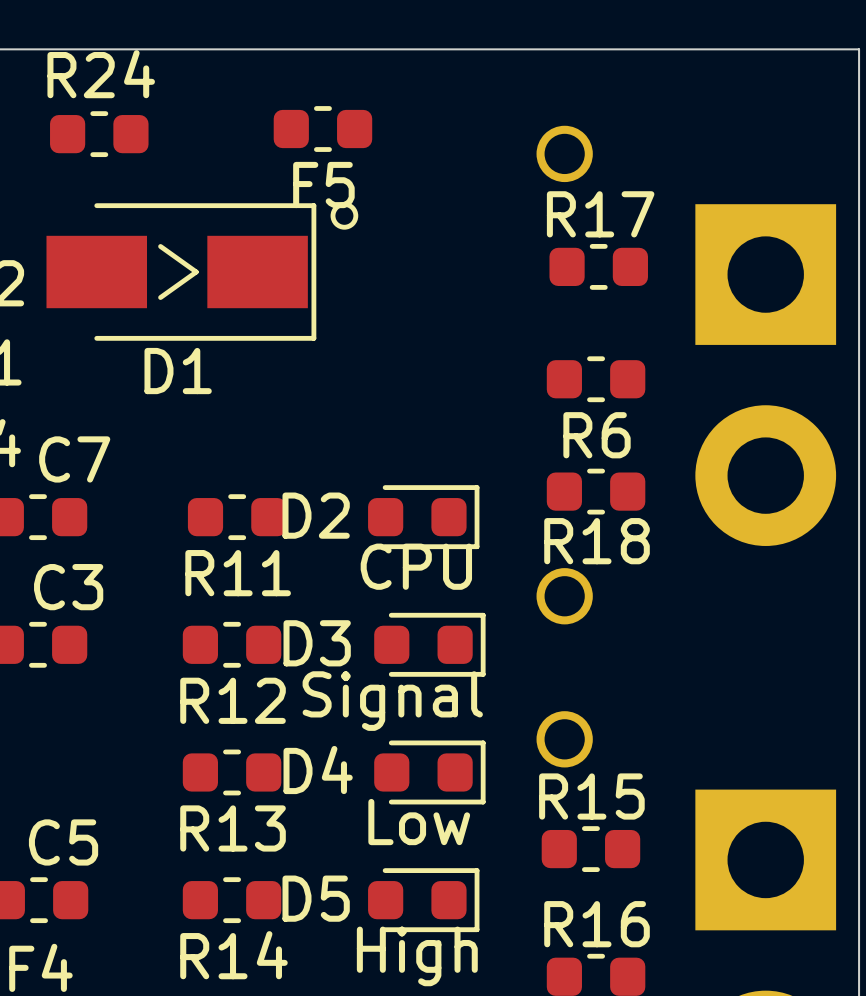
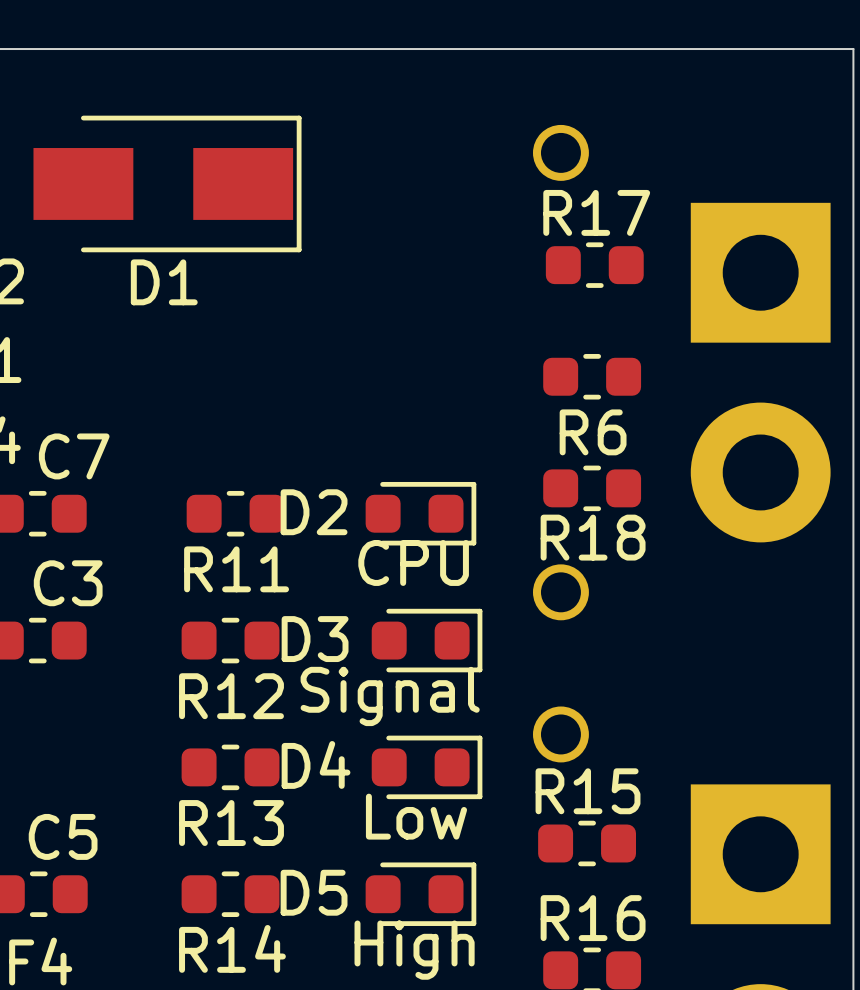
F5: (322, 129) -> none
R24: (99, 134) -> none
drawing: [330, 201, 359, 230] -> none
line: (160, 246) (196, 272) (160, 297) -> none
D1 position: (181, 272) -> (167, 183)

